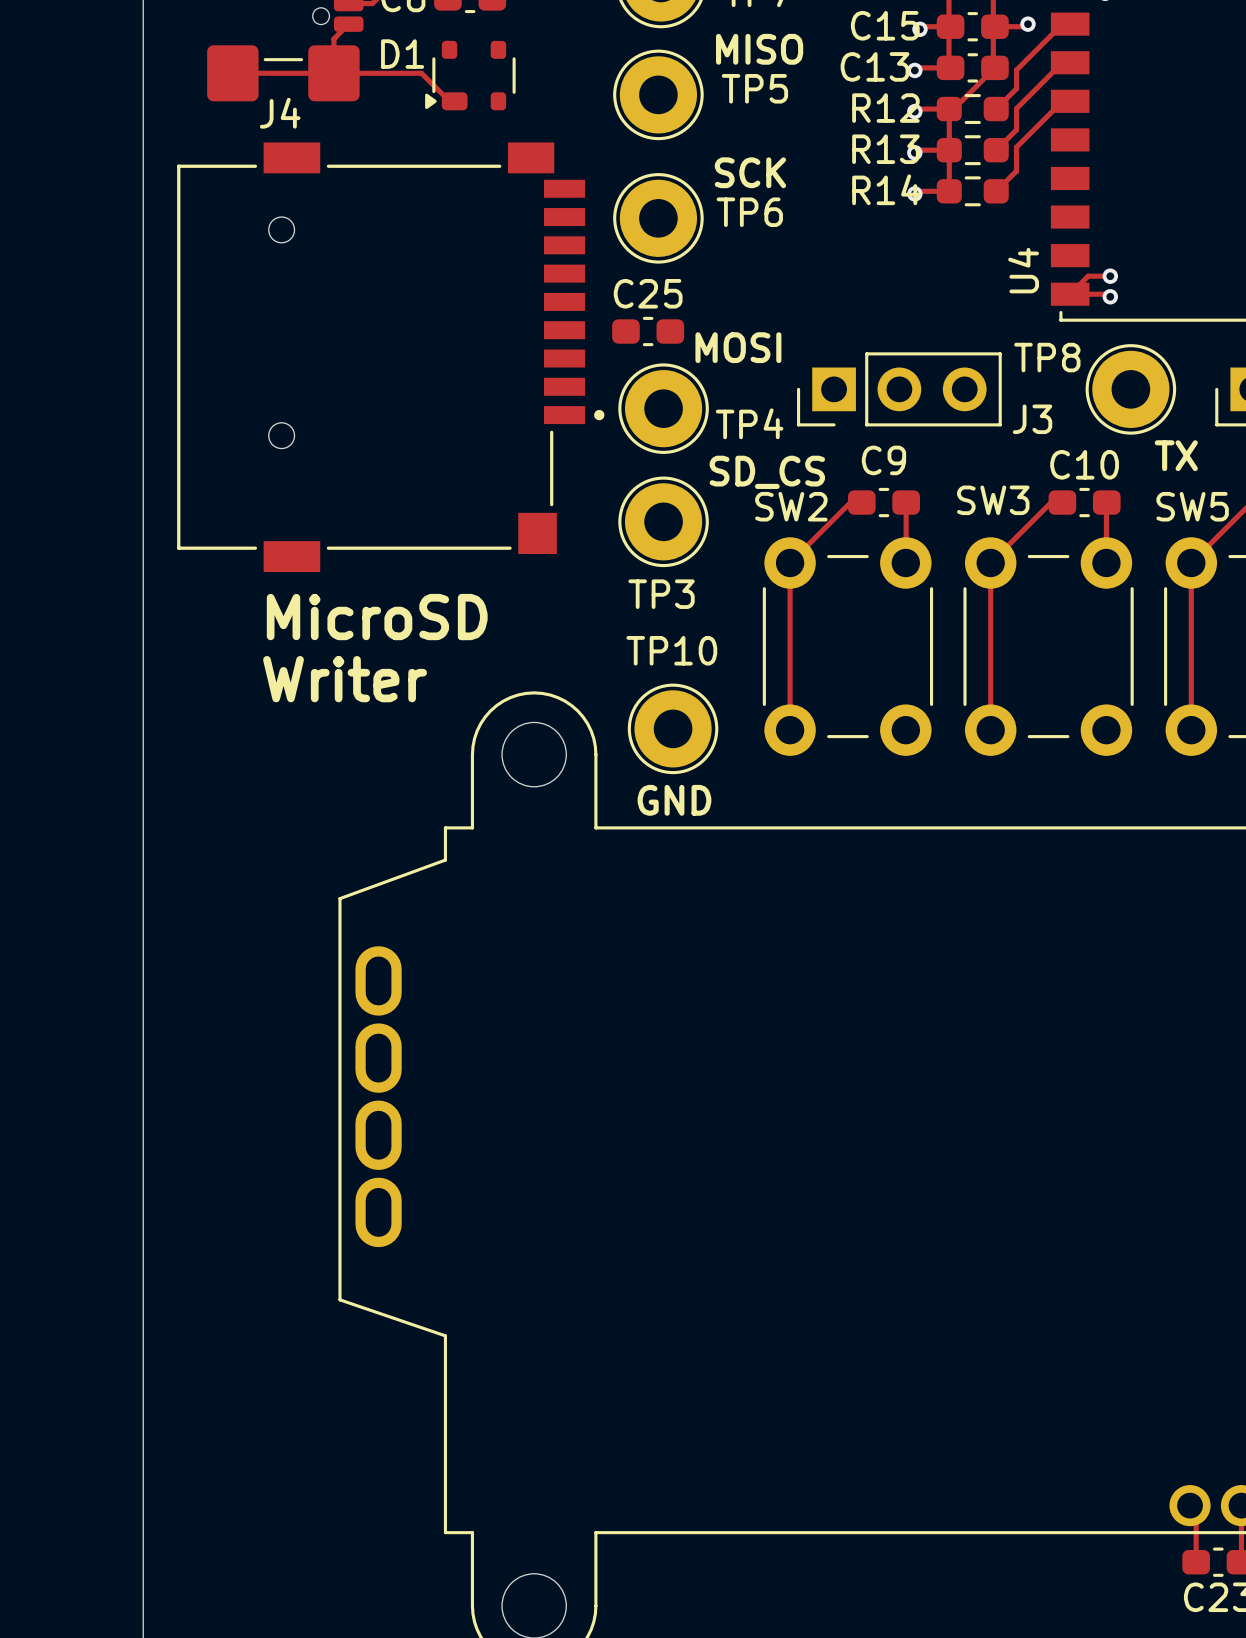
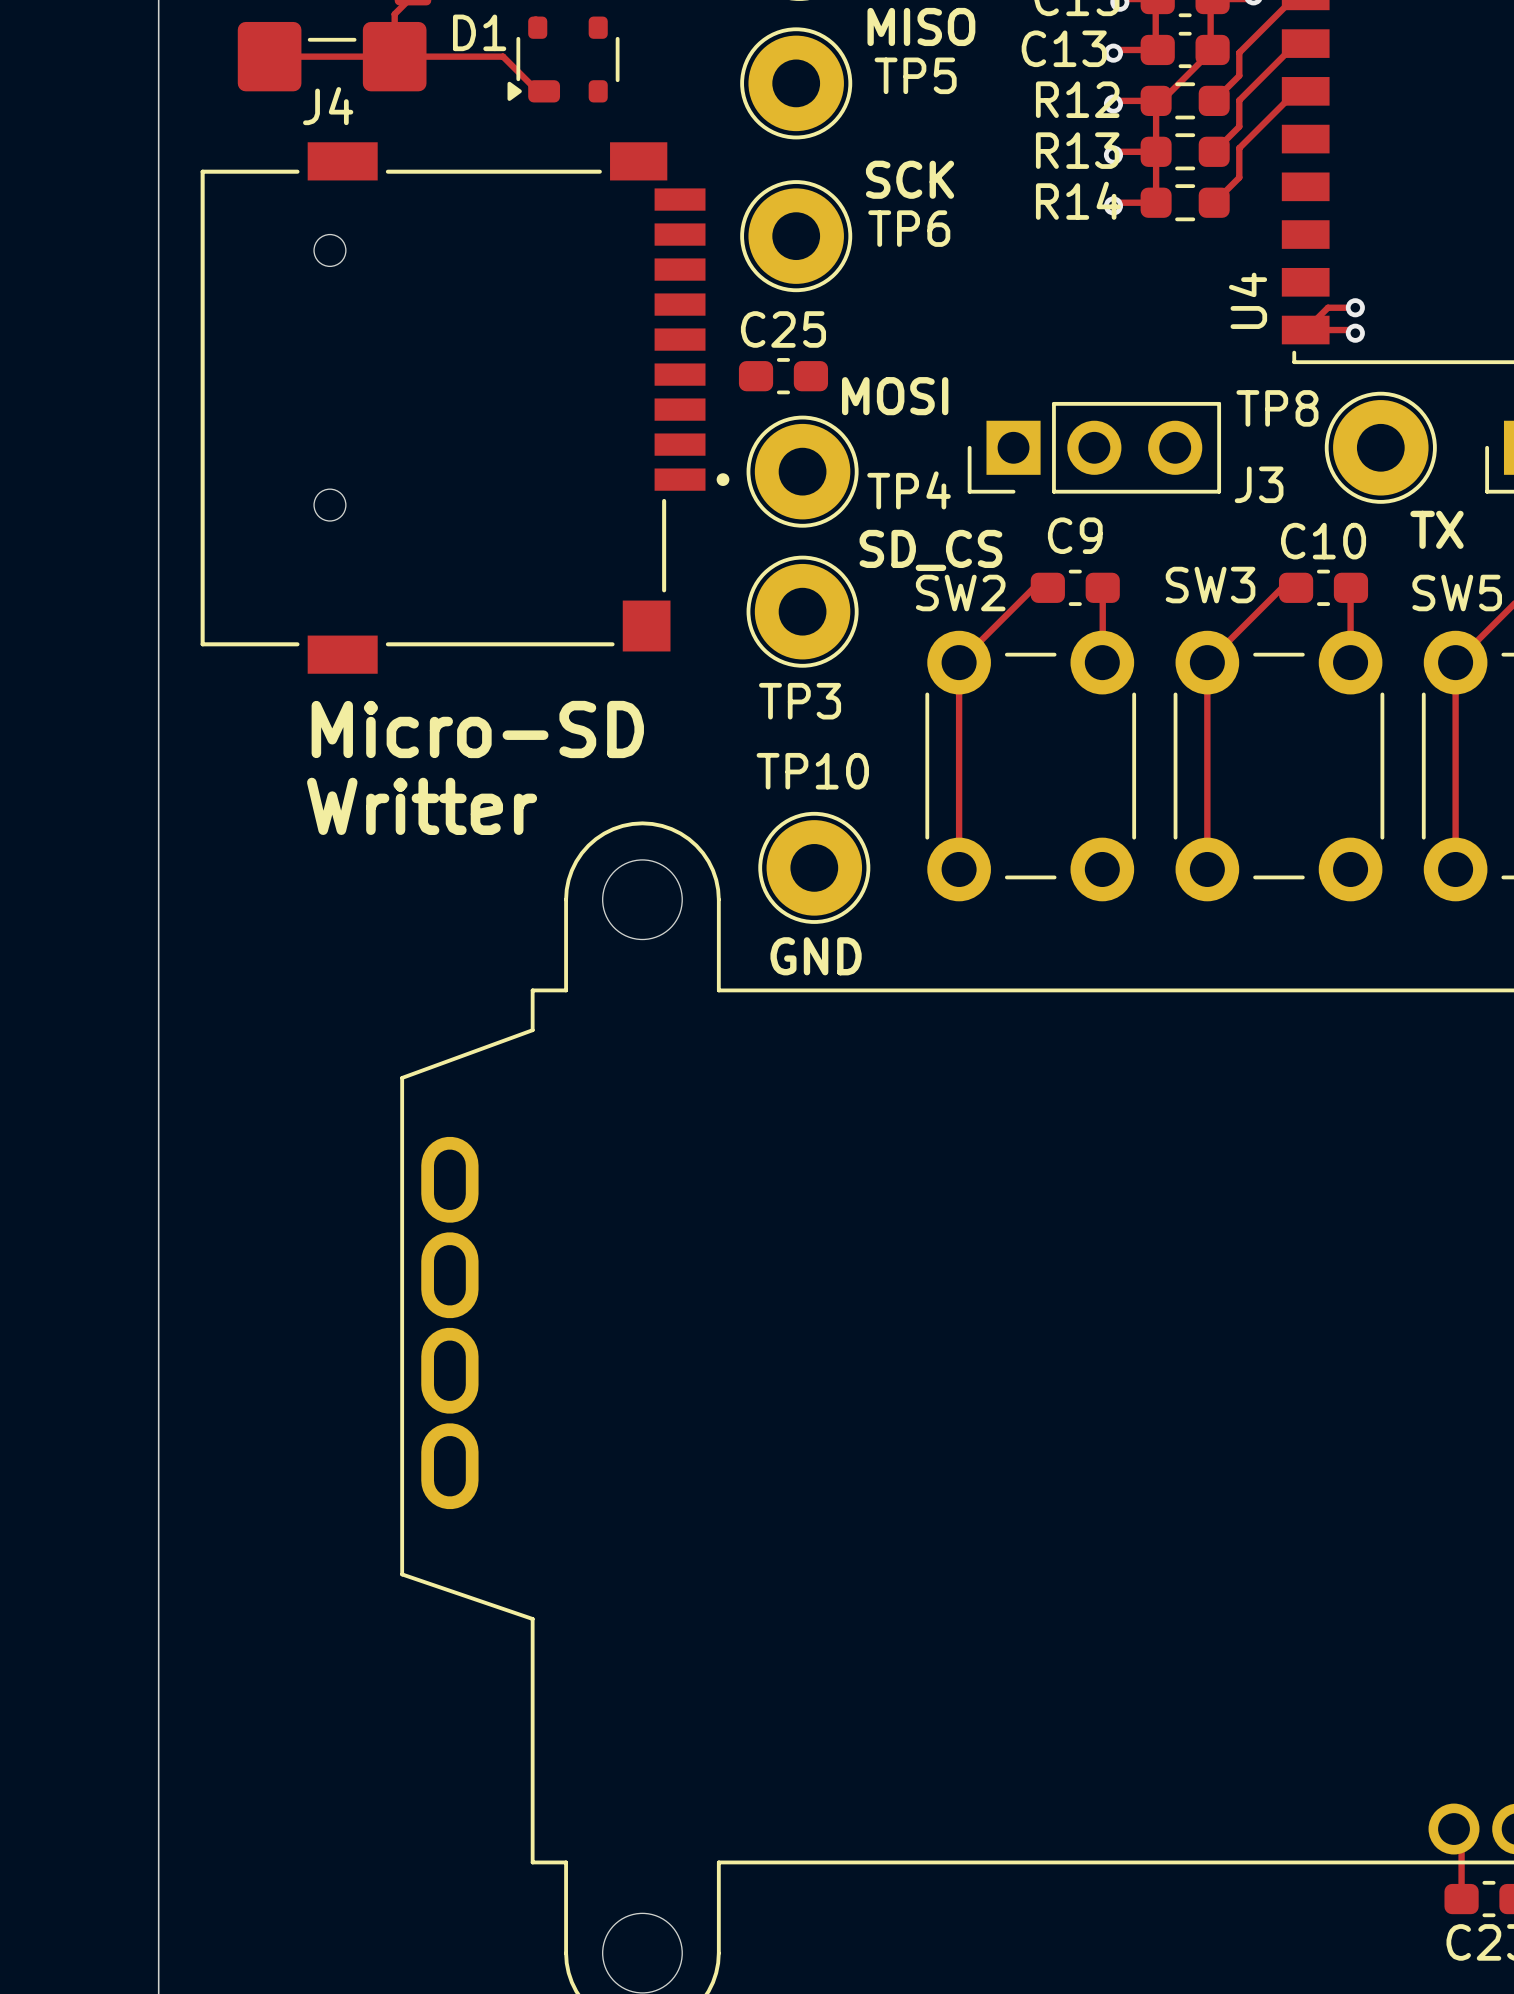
text: MicroSD (377, 617) -> Micro-SD (477, 729)
text: Writer (345, 679) -> Writter (422, 806)

